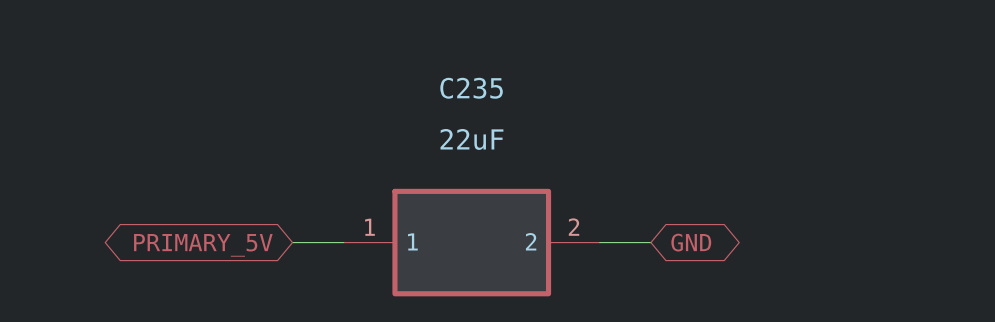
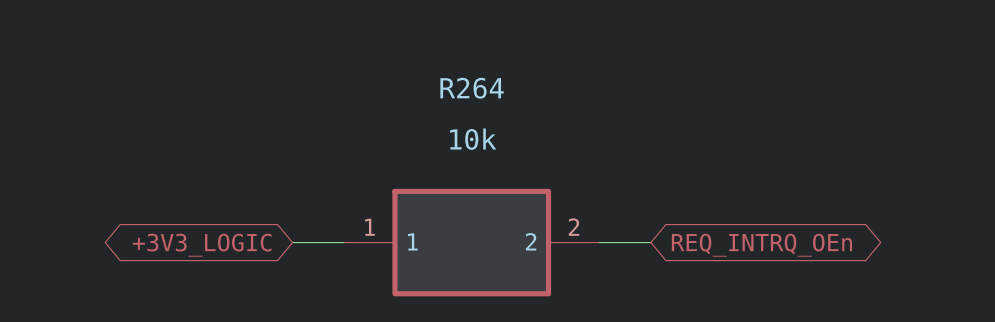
C235 name: C235 (471, 88) -> R264 (472, 88)
C235 value: 22uF (471, 139) -> 10k (473, 139)
global label: GND (691, 242) -> REQ_INTRQ_OEn (761, 245)
global label: PRIMARY_5V (203, 245) -> +3V3_LOGIC (202, 245)

